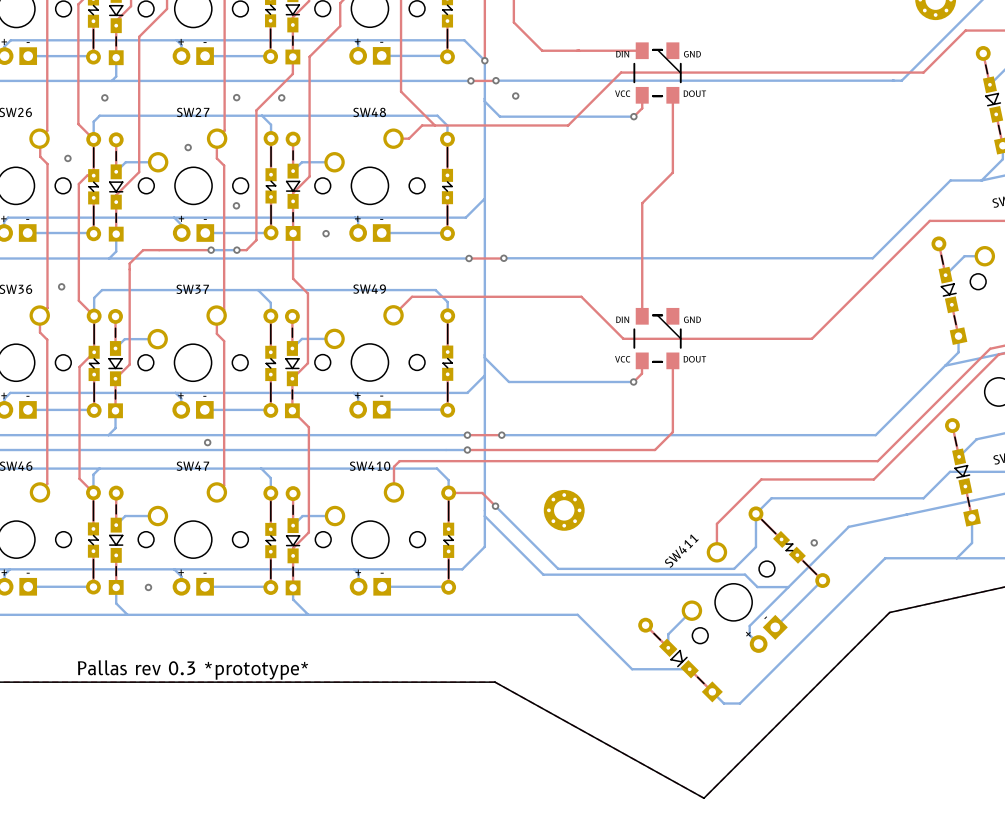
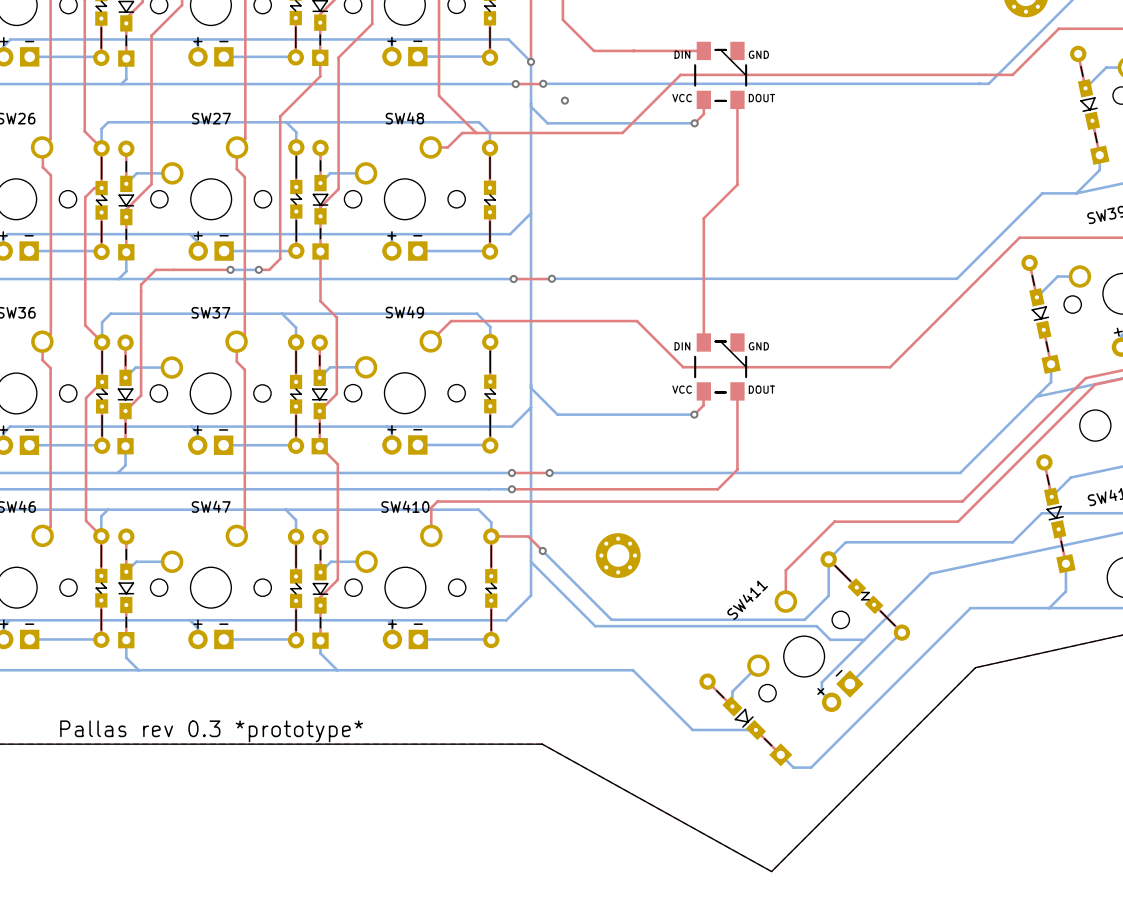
via: (104, 97) -> none
via: (236, 97) -> none
via: (281, 97) -> none
via: (188, 147) -> none
via: (67, 158) -> none
via: (236, 205) -> none
via: (326, 233) -> none
via: (61, 286) -> none
via: (207, 442) -> none
via: (814, 542) -> none
via: (148, 587) -> none

